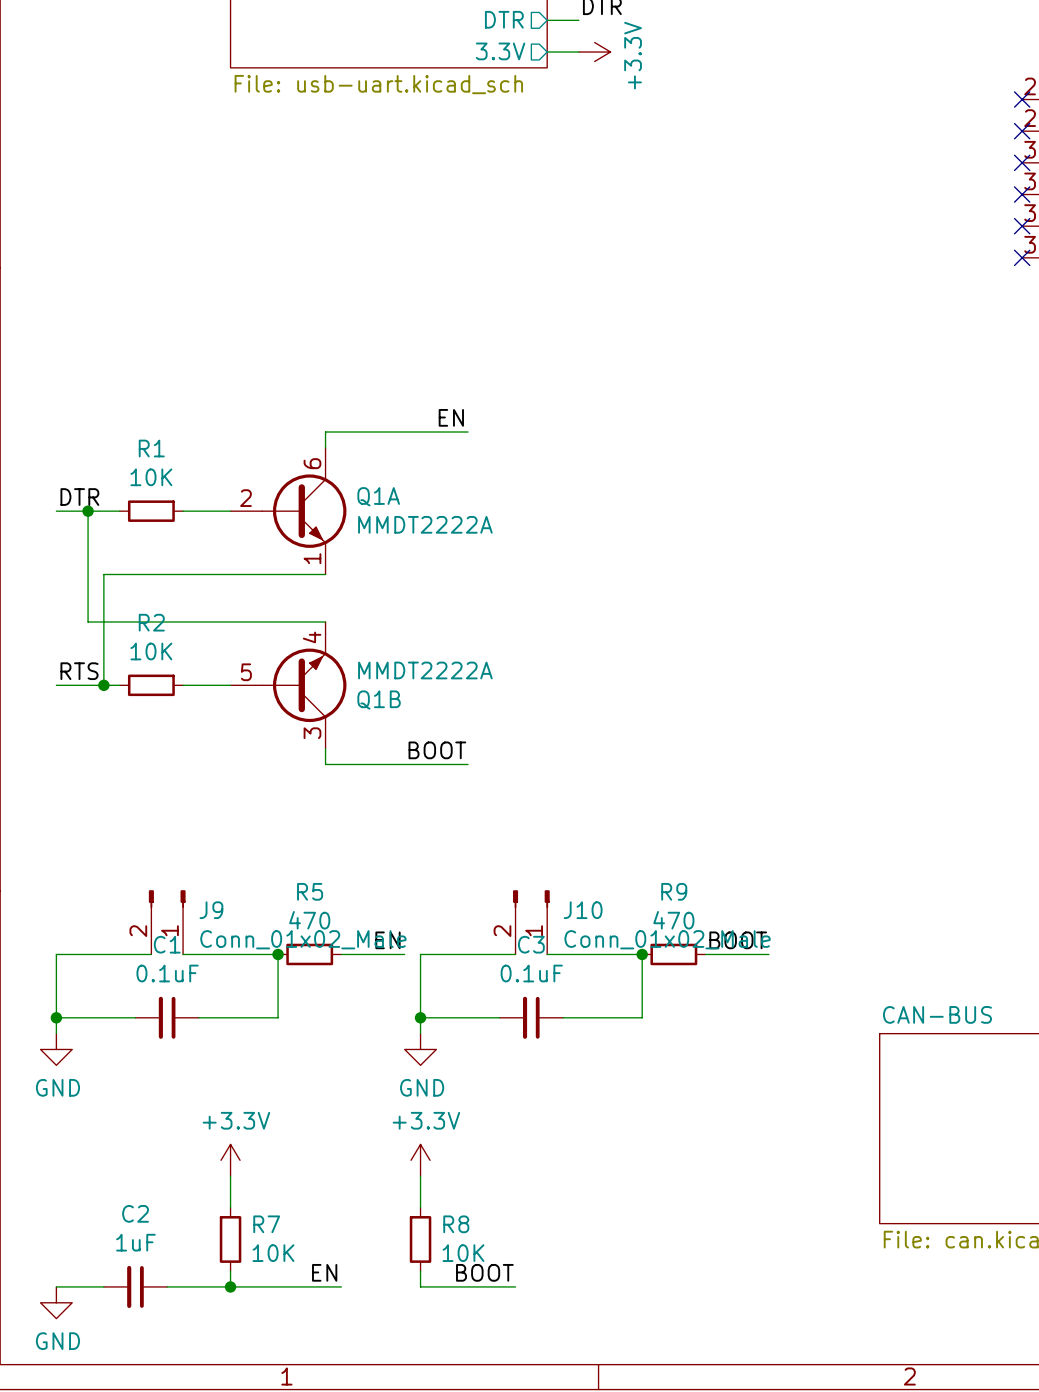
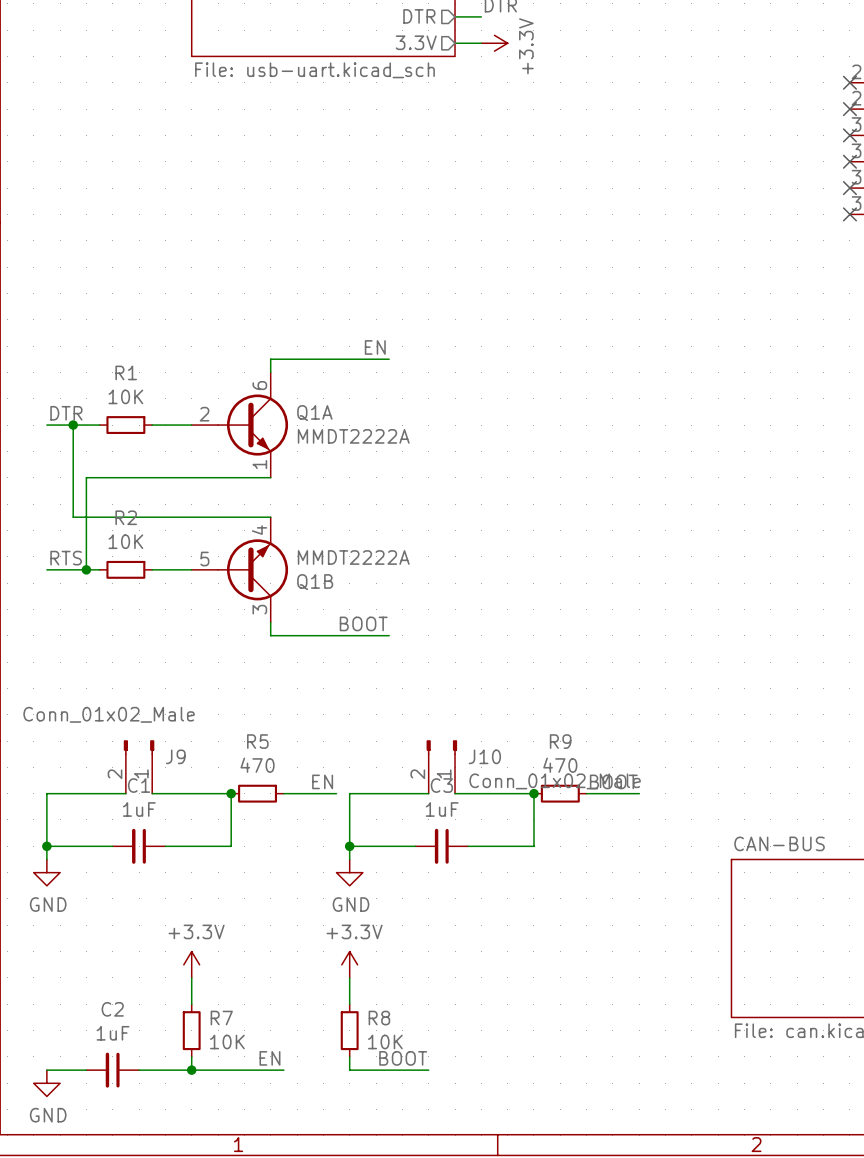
J9 value position: Conn_01x02_Male (303, 939) -> Conn_01x02_Male (109, 714)
C1 value: 0.1uF (167, 973) -> 1uF (139, 809)
C3 value: 0.1uF (531, 973) -> 1uF (442, 809)

